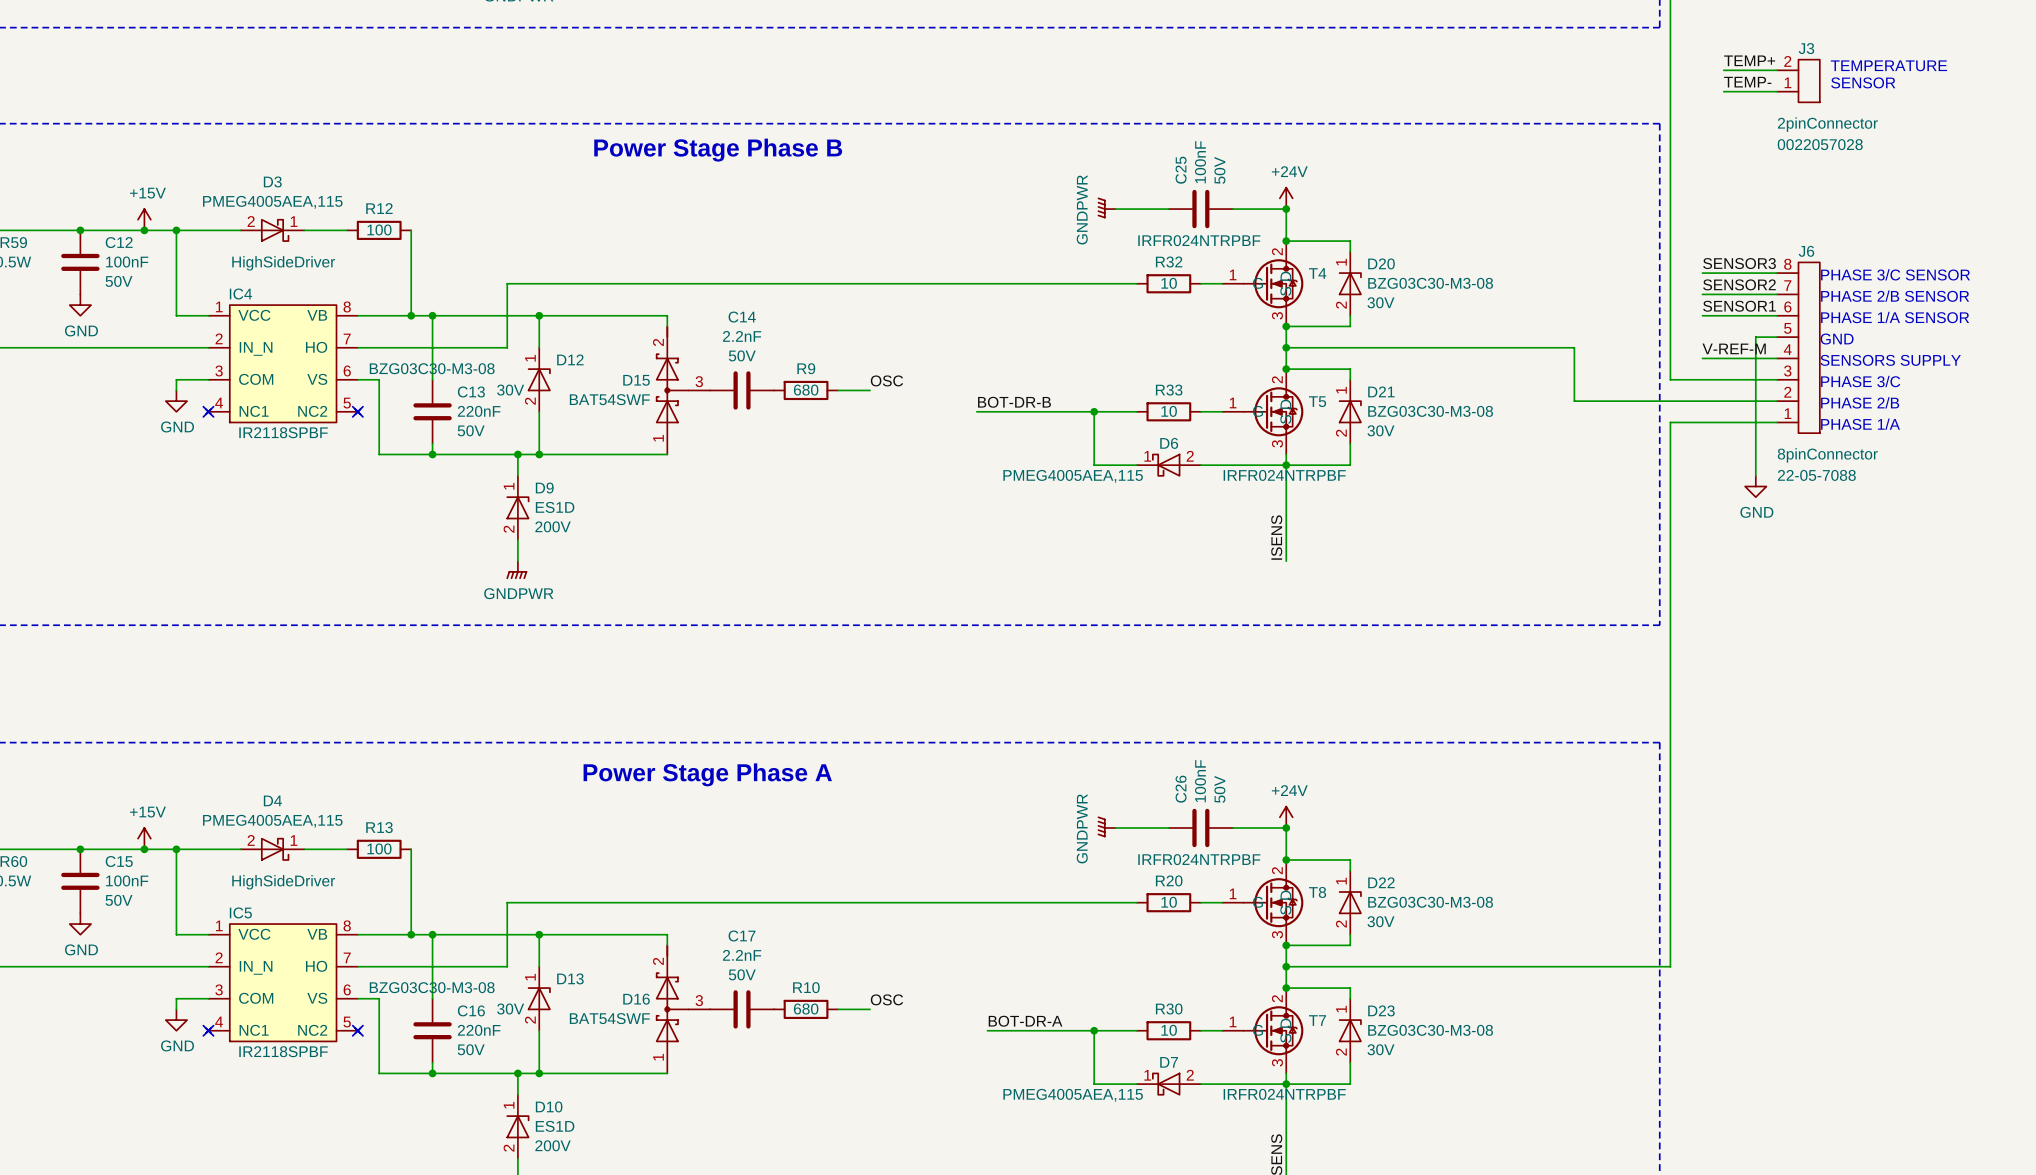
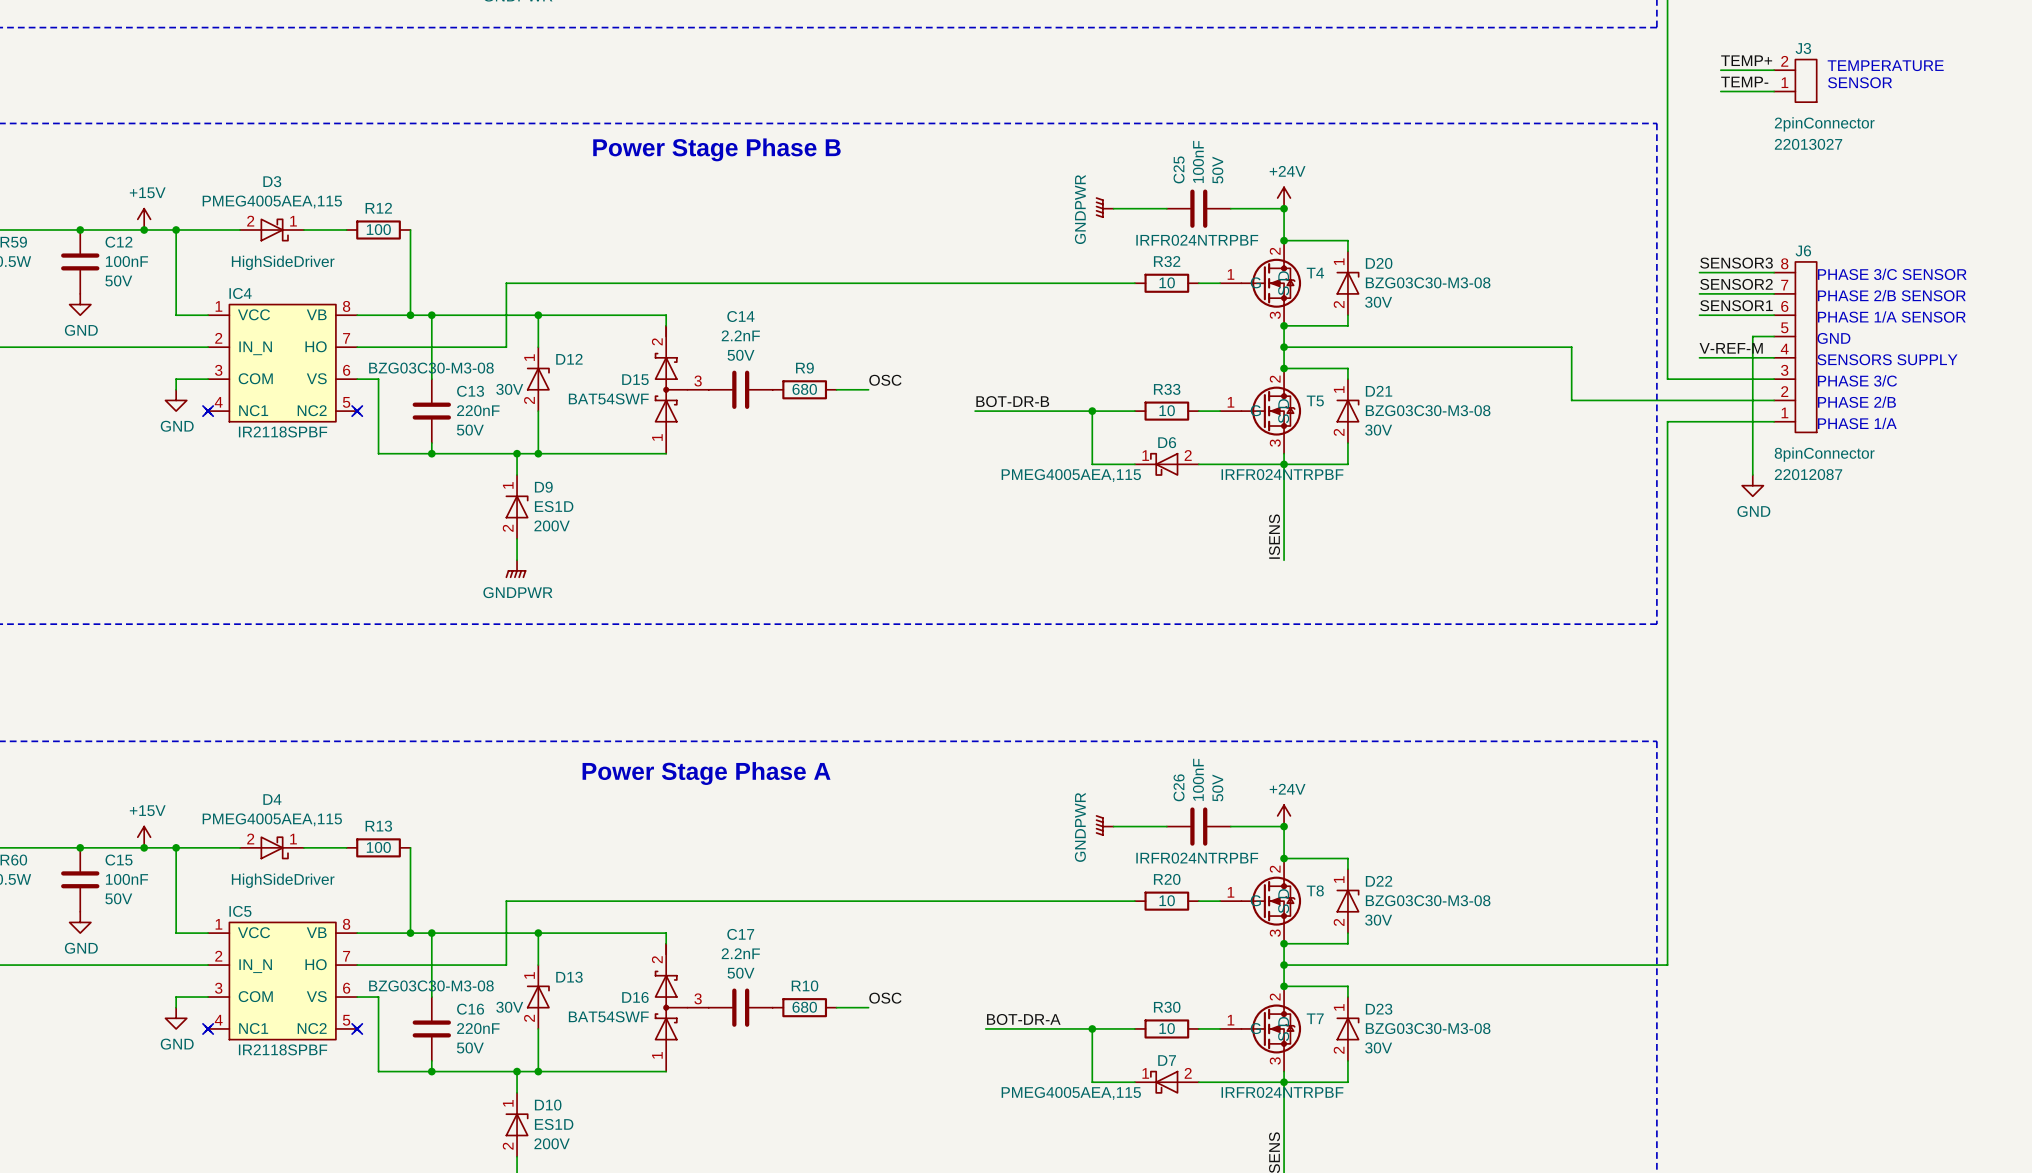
J3 text: 0022057028 (1820, 144) -> 22013027 (1808, 144)
J6 text: 22-05-7088 (1816, 475) -> 22012087 (1808, 474)

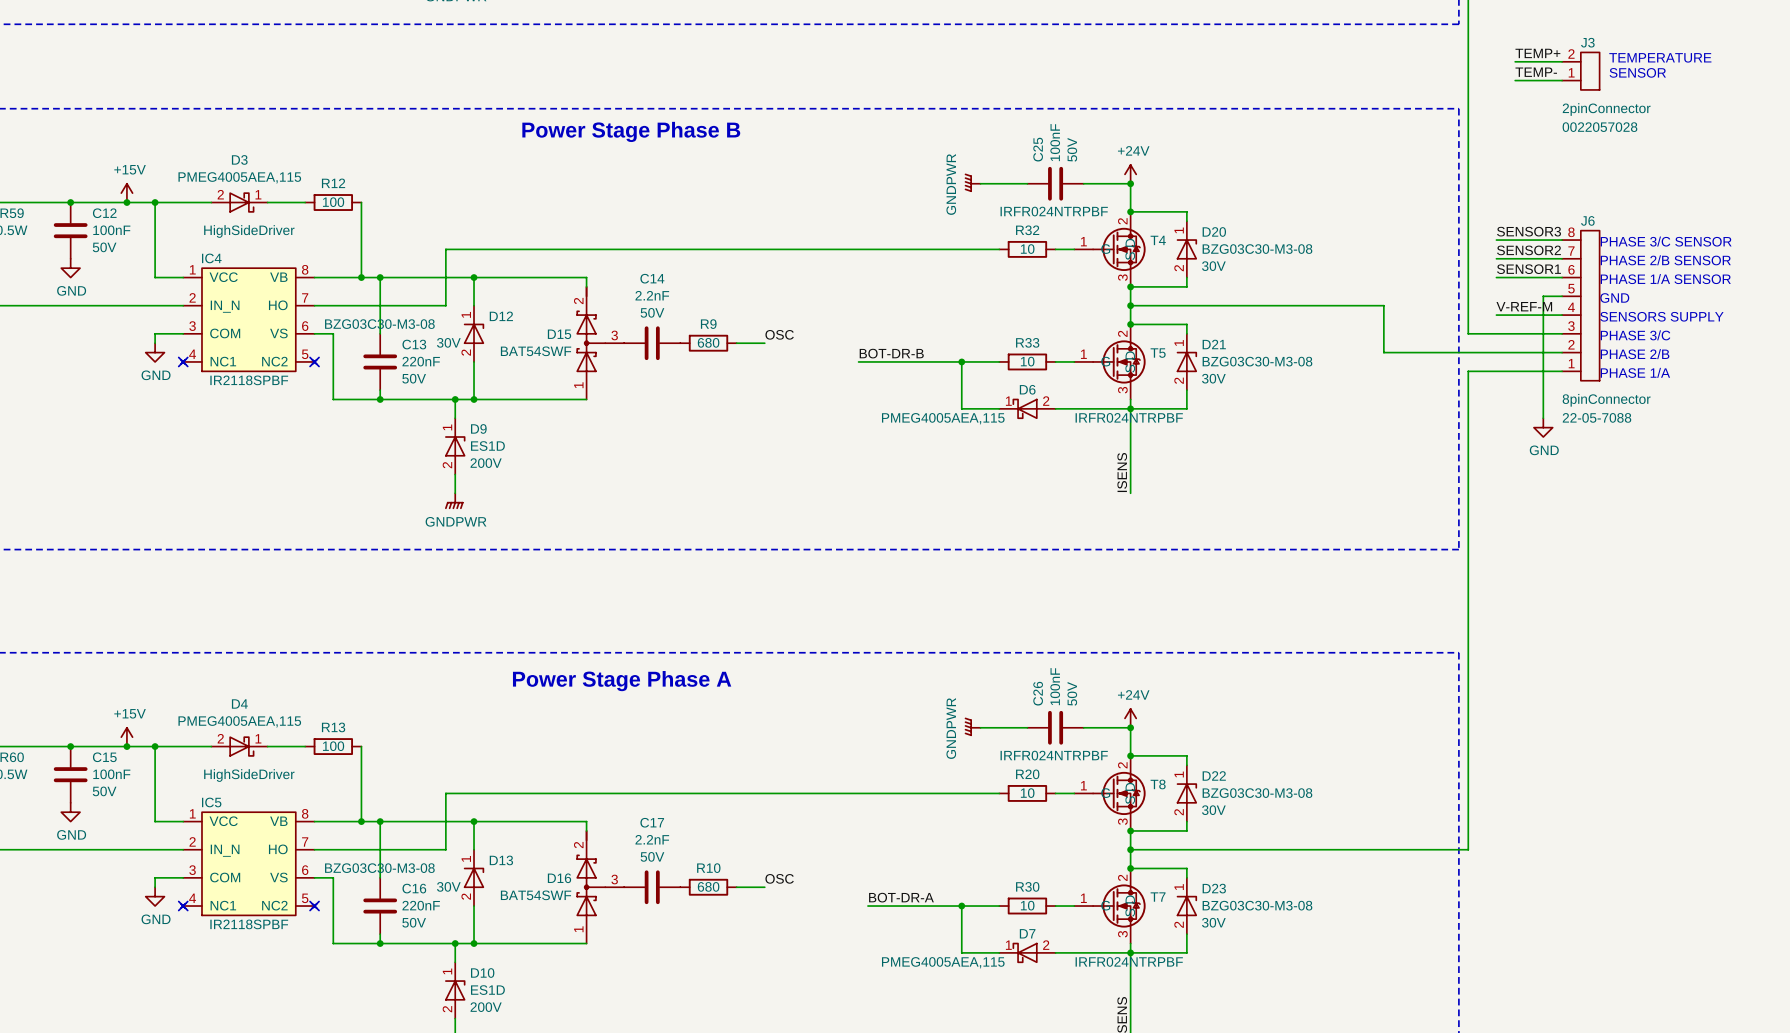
J3 text: 22013027 (1808, 144) -> 0022057028 (1599, 127)
J6 text: 22012087 (1808, 474) -> 22-05-7088 (1597, 417)

